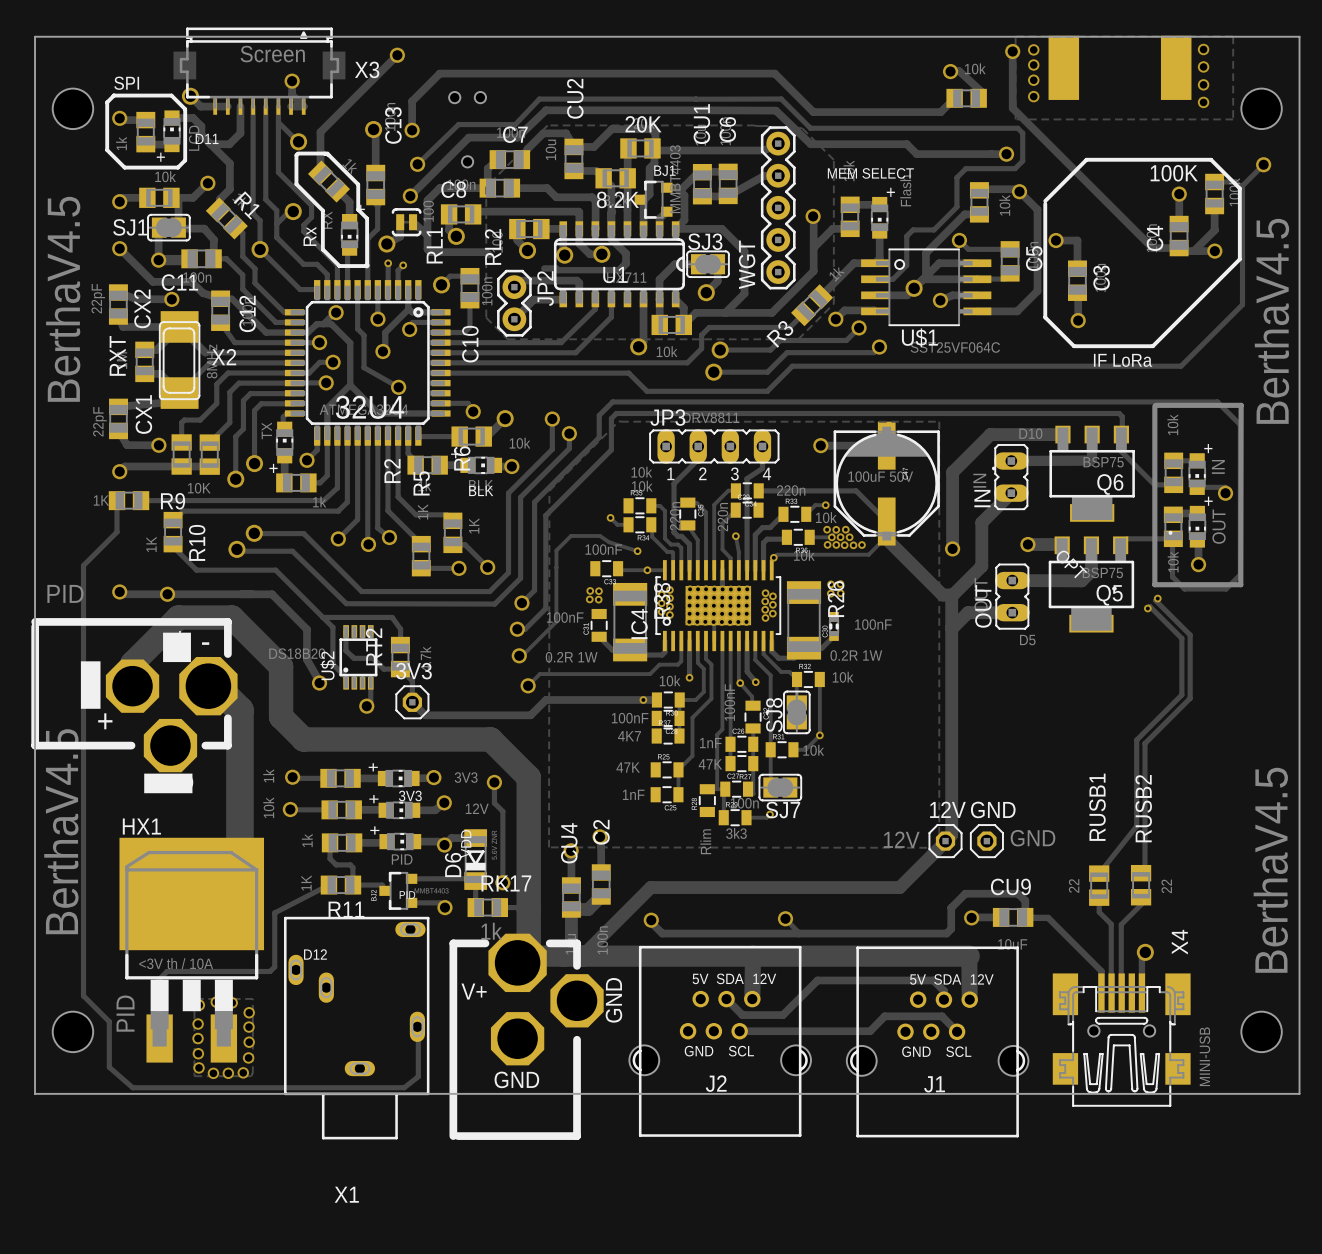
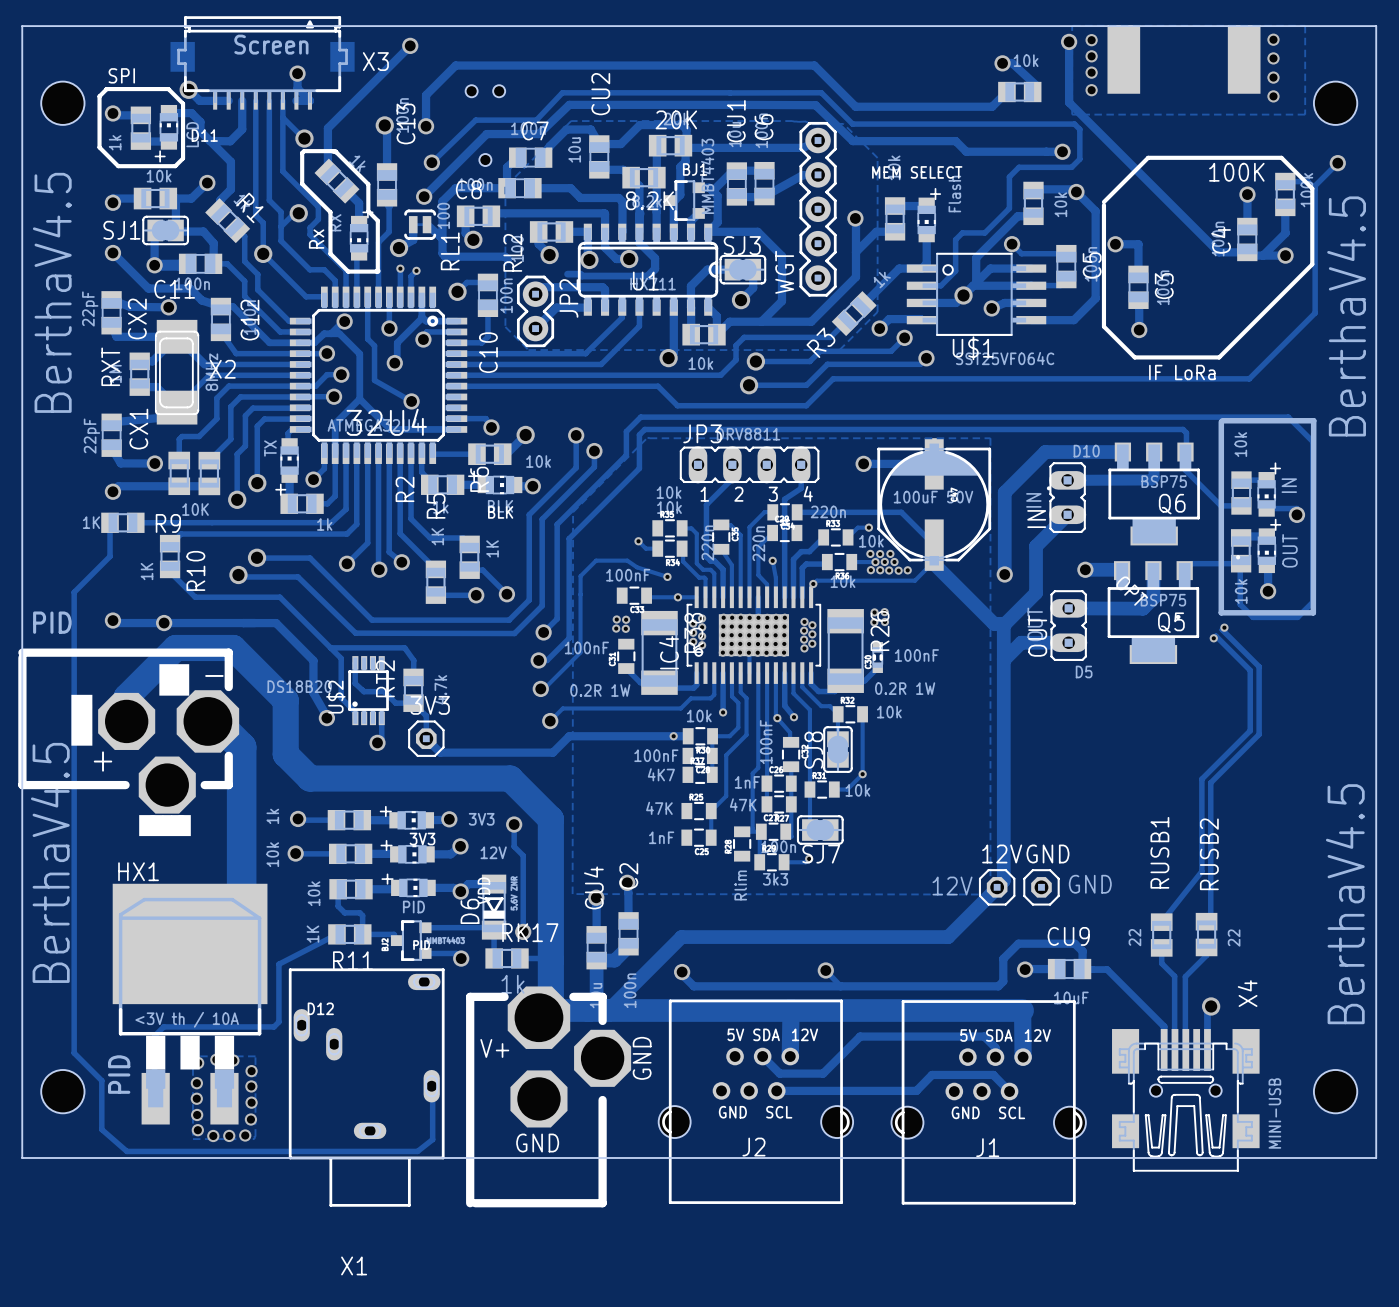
part value: 1k (307, 840) -> 10k (314, 893)

